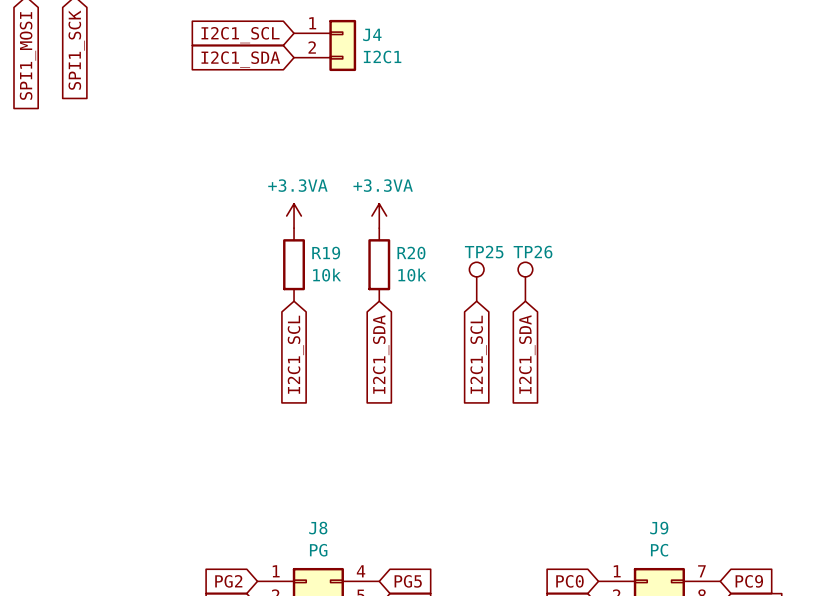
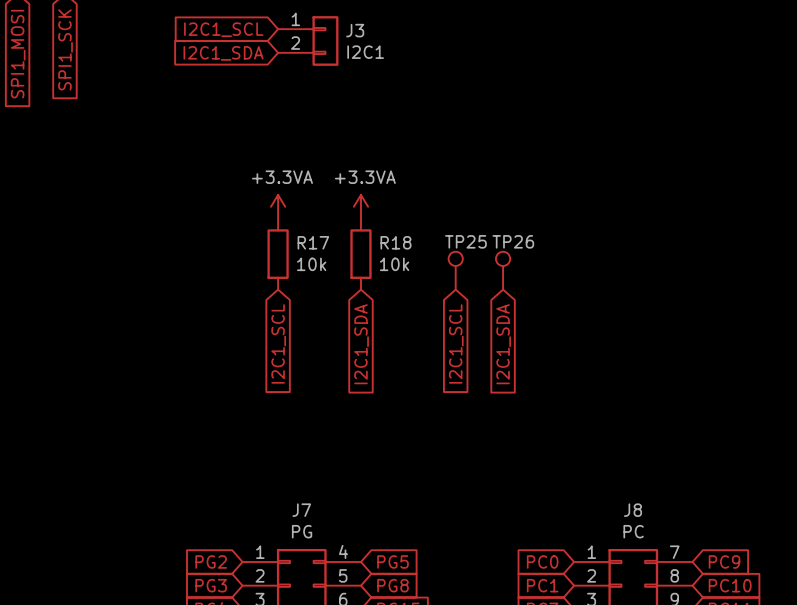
J4 name: J4 (372, 34) -> J3 (355, 30)
R19 name: R19 (326, 253) -> R17 (313, 242)
R20 name: R20 (411, 253) -> R18 (395, 242)
J8 name: J8 (318, 528) -> J7 (301, 510)
J9 name: J9 (659, 528) -> J8 (633, 510)

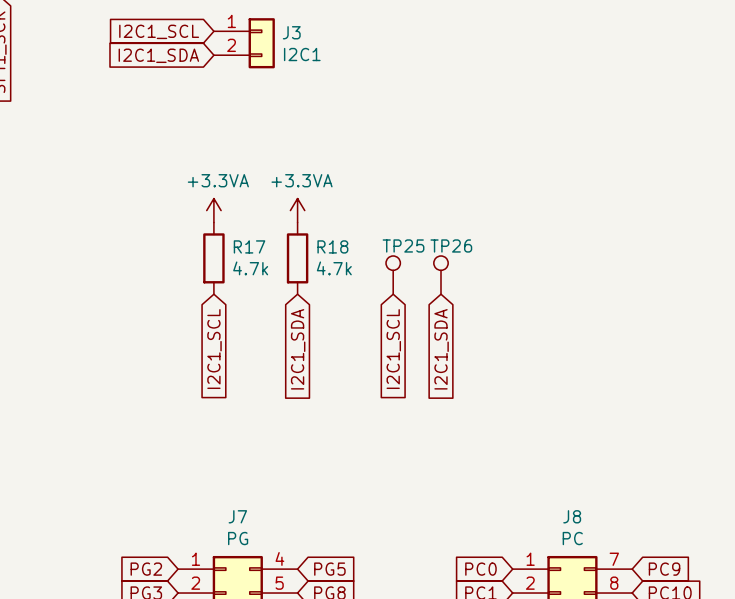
R17 value: 10k (311, 264) -> 4.7k (250, 268)
R18 value: 10k (394, 264) -> 4.7k (334, 268)

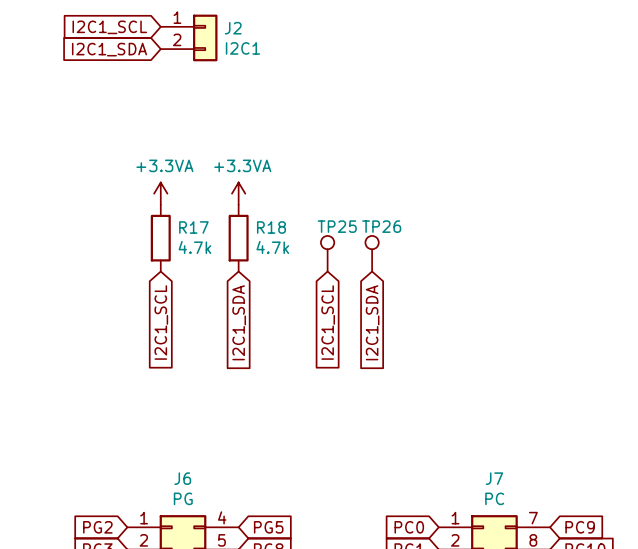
J3 name: J3 (291, 32) -> J2 (233, 28)
J7 name: J7 (237, 516) -> J6 (182, 478)
J8 name: J8 (572, 516) -> J7 (494, 478)

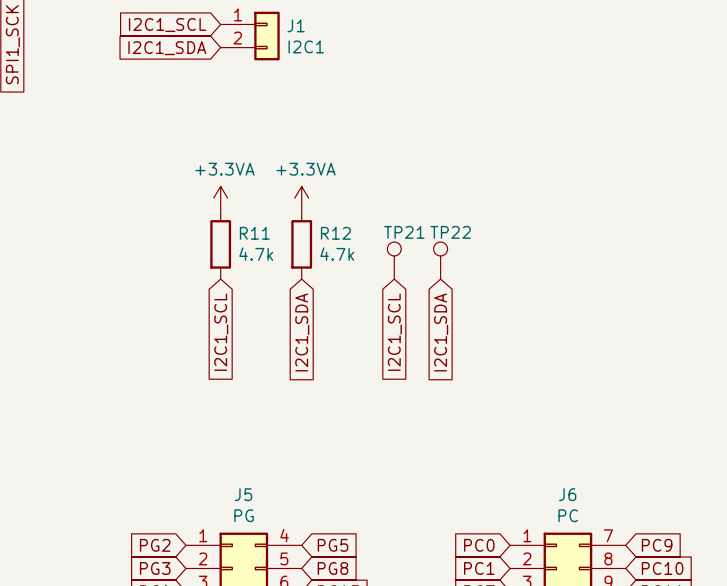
J2 name: J2 (233, 28) -> J1 (296, 25)
TP25 name: TP25 (337, 226) -> TP21 (404, 232)
TP26 name: TP26 (381, 226) -> TP22 (450, 232)
R17 name: R17 (193, 227) -> R11 (254, 233)
R18 name: R18 (271, 227) -> R12 (335, 233)
J6 name: J6 (182, 478) -> J5 (243, 494)
J7 name: J7 (494, 478) -> J6 (567, 494)

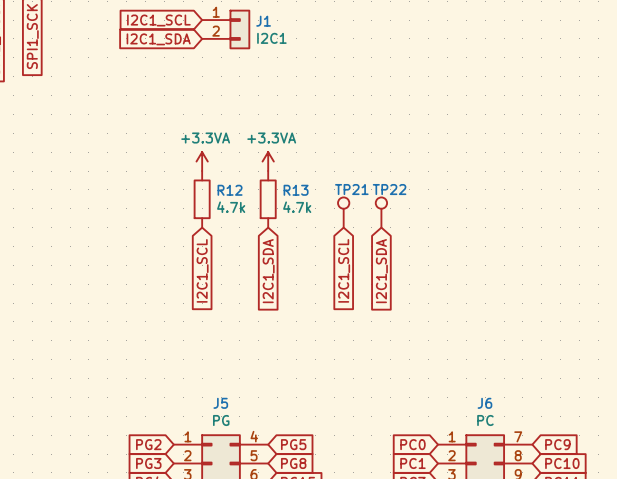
R11 name: R11 (254, 233) -> R12 (230, 190)
R12 name: R12 (335, 233) -> R13 (296, 190)

